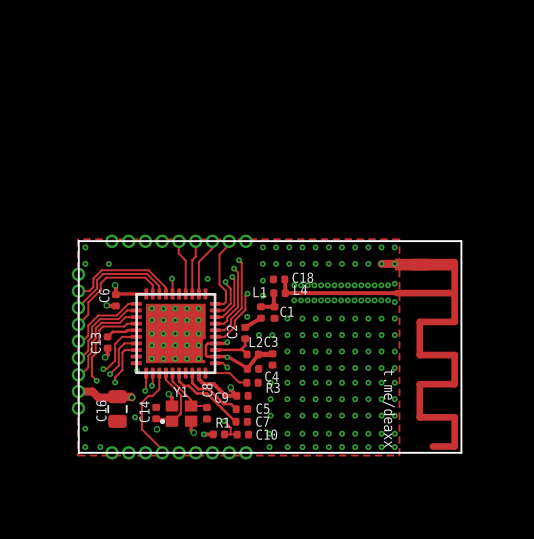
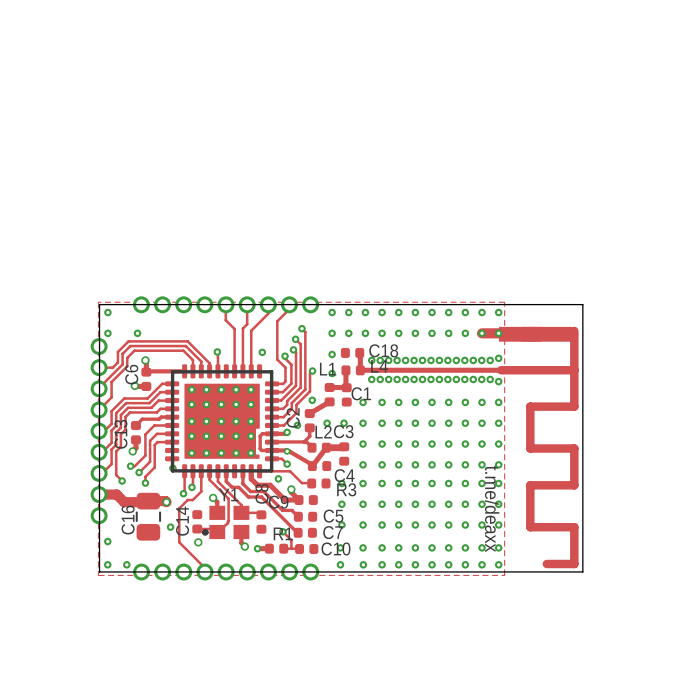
via: none -> (297, 425)
via: none -> (278, 478)

